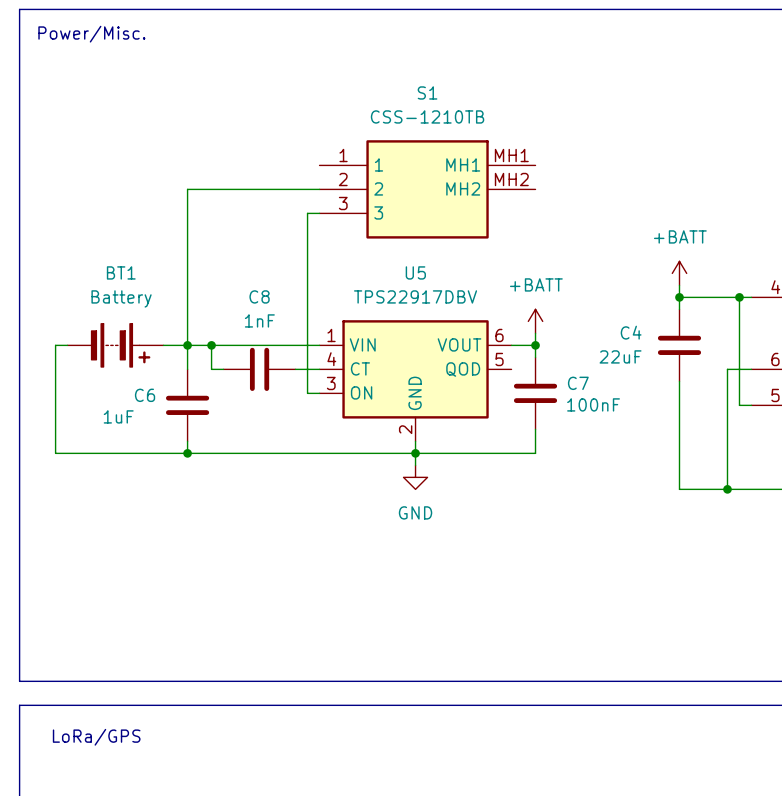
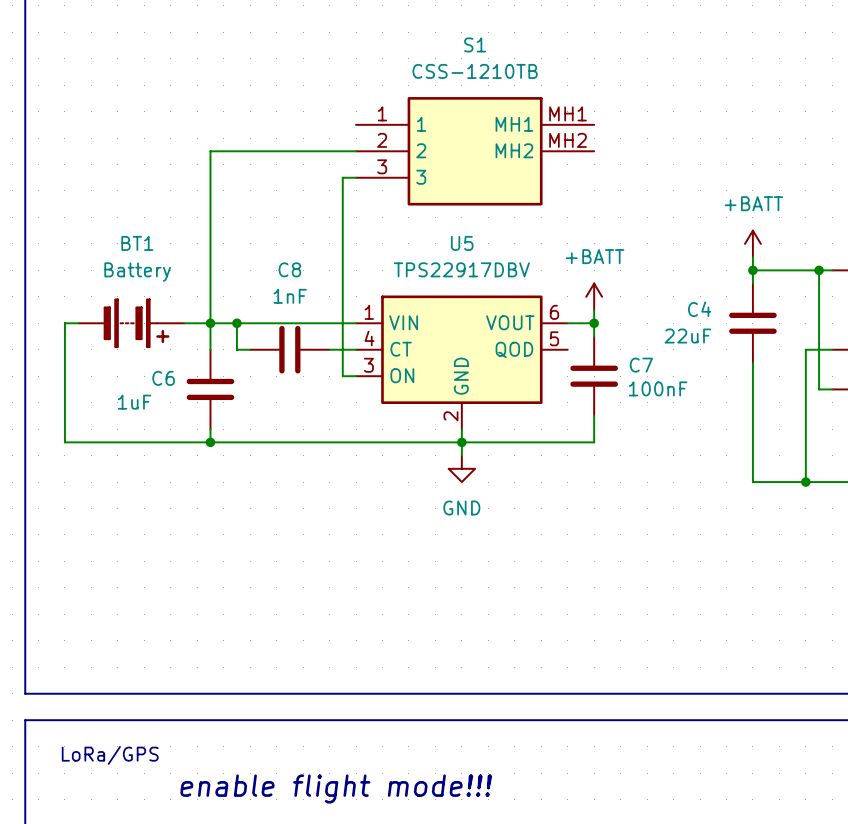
text: none -> enable flight mode!!! (336, 788)

